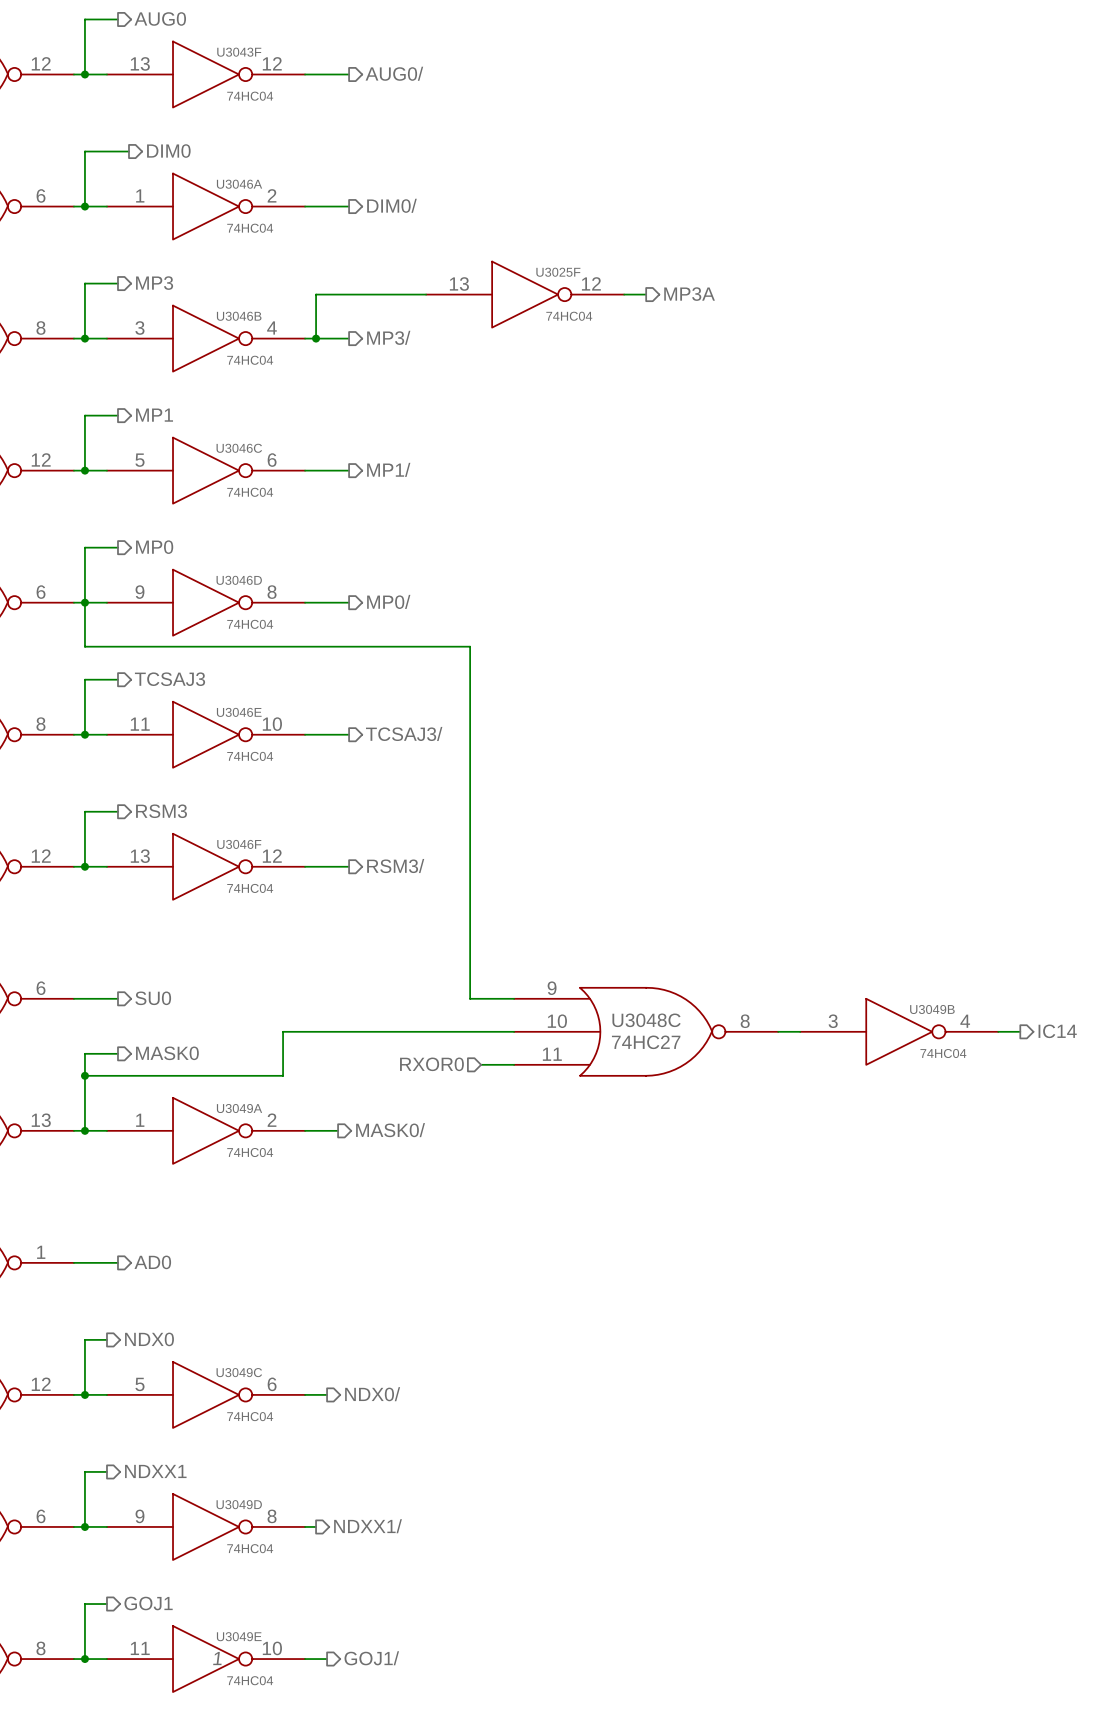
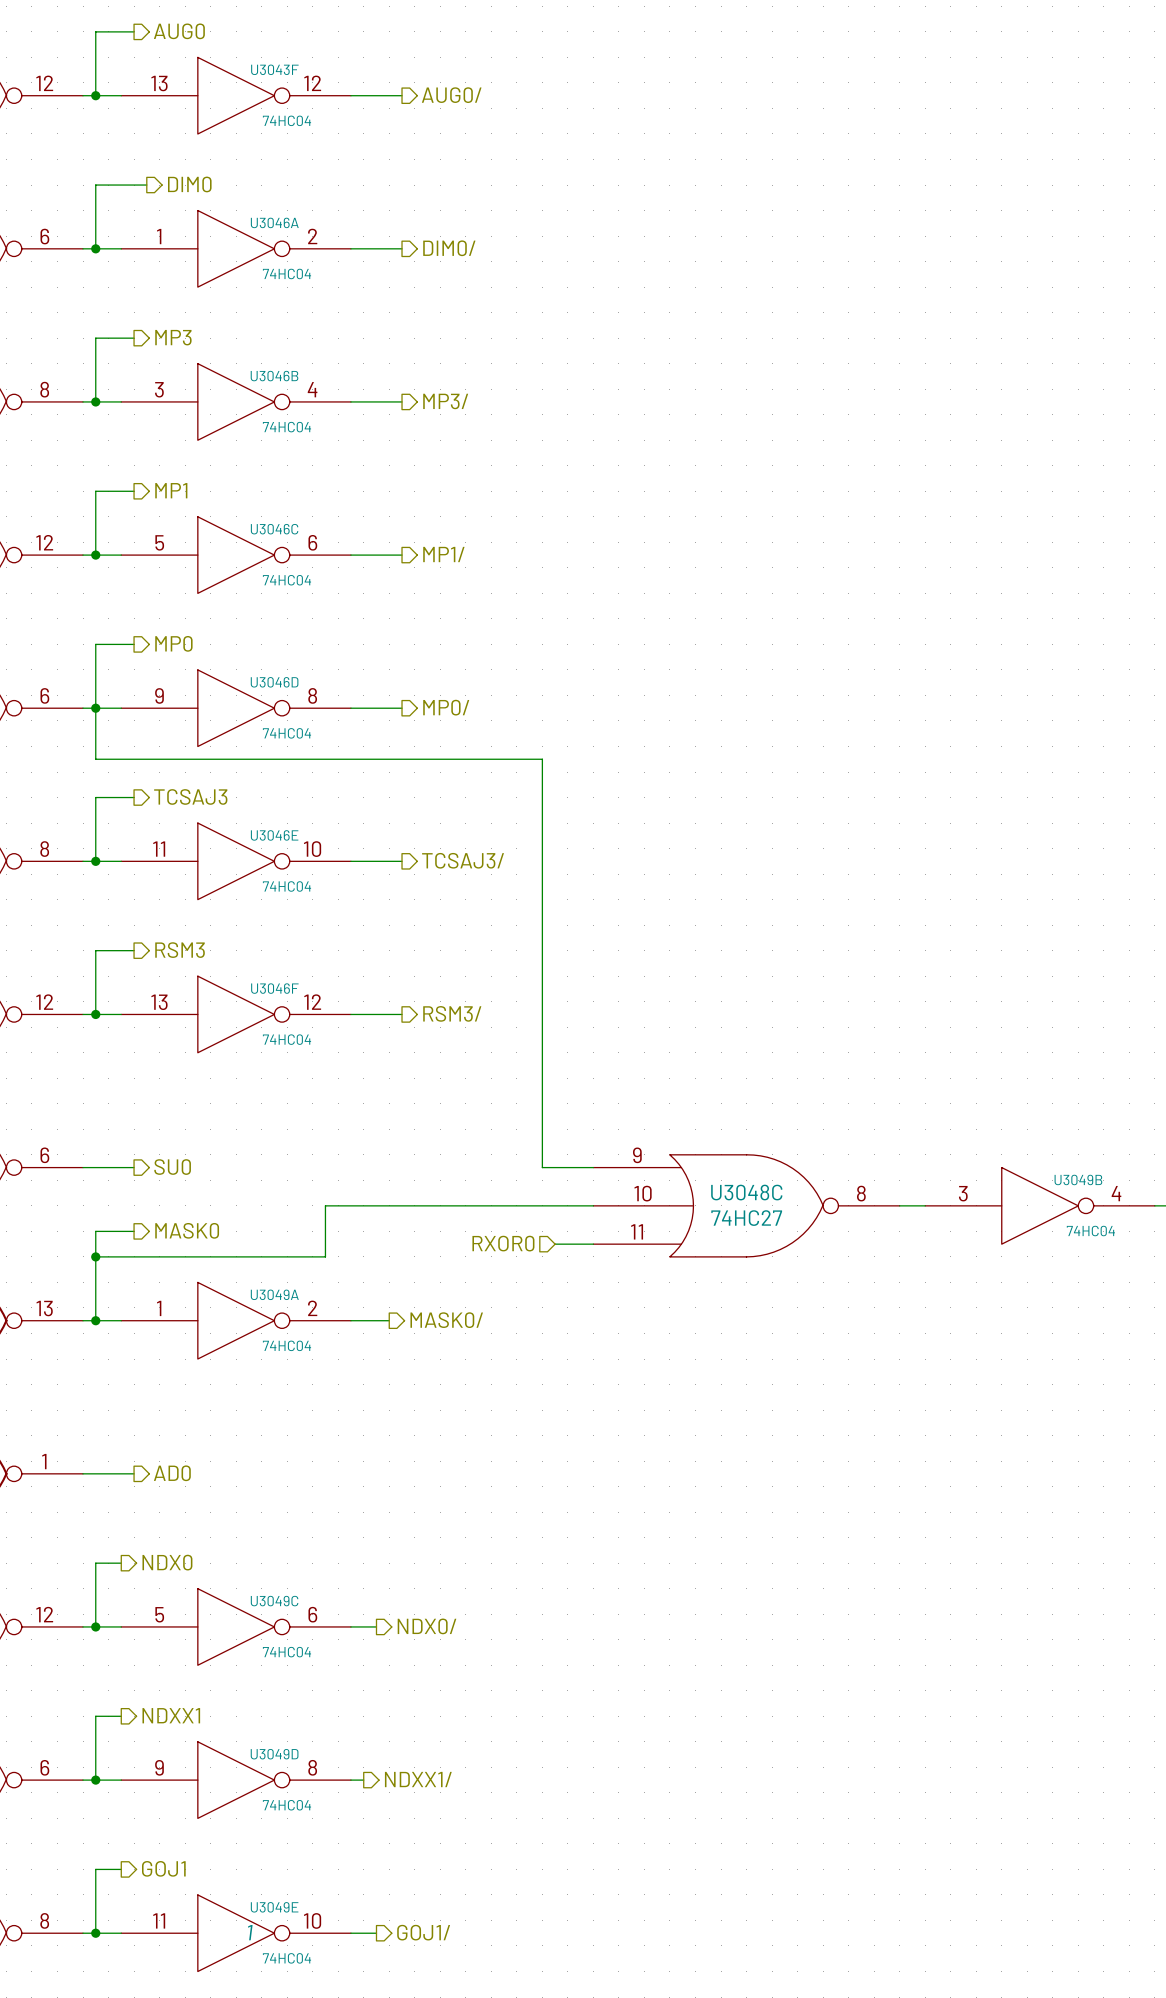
wire: (426, 294) (316, 294) (316, 338) -> none
U3025F: 74HC04 (525, 294) -> none
wire: (624, 294) (646, 294) -> none
hierarchical label: MP3A (689, 294) -> none
junction: (316, 338) -> none

